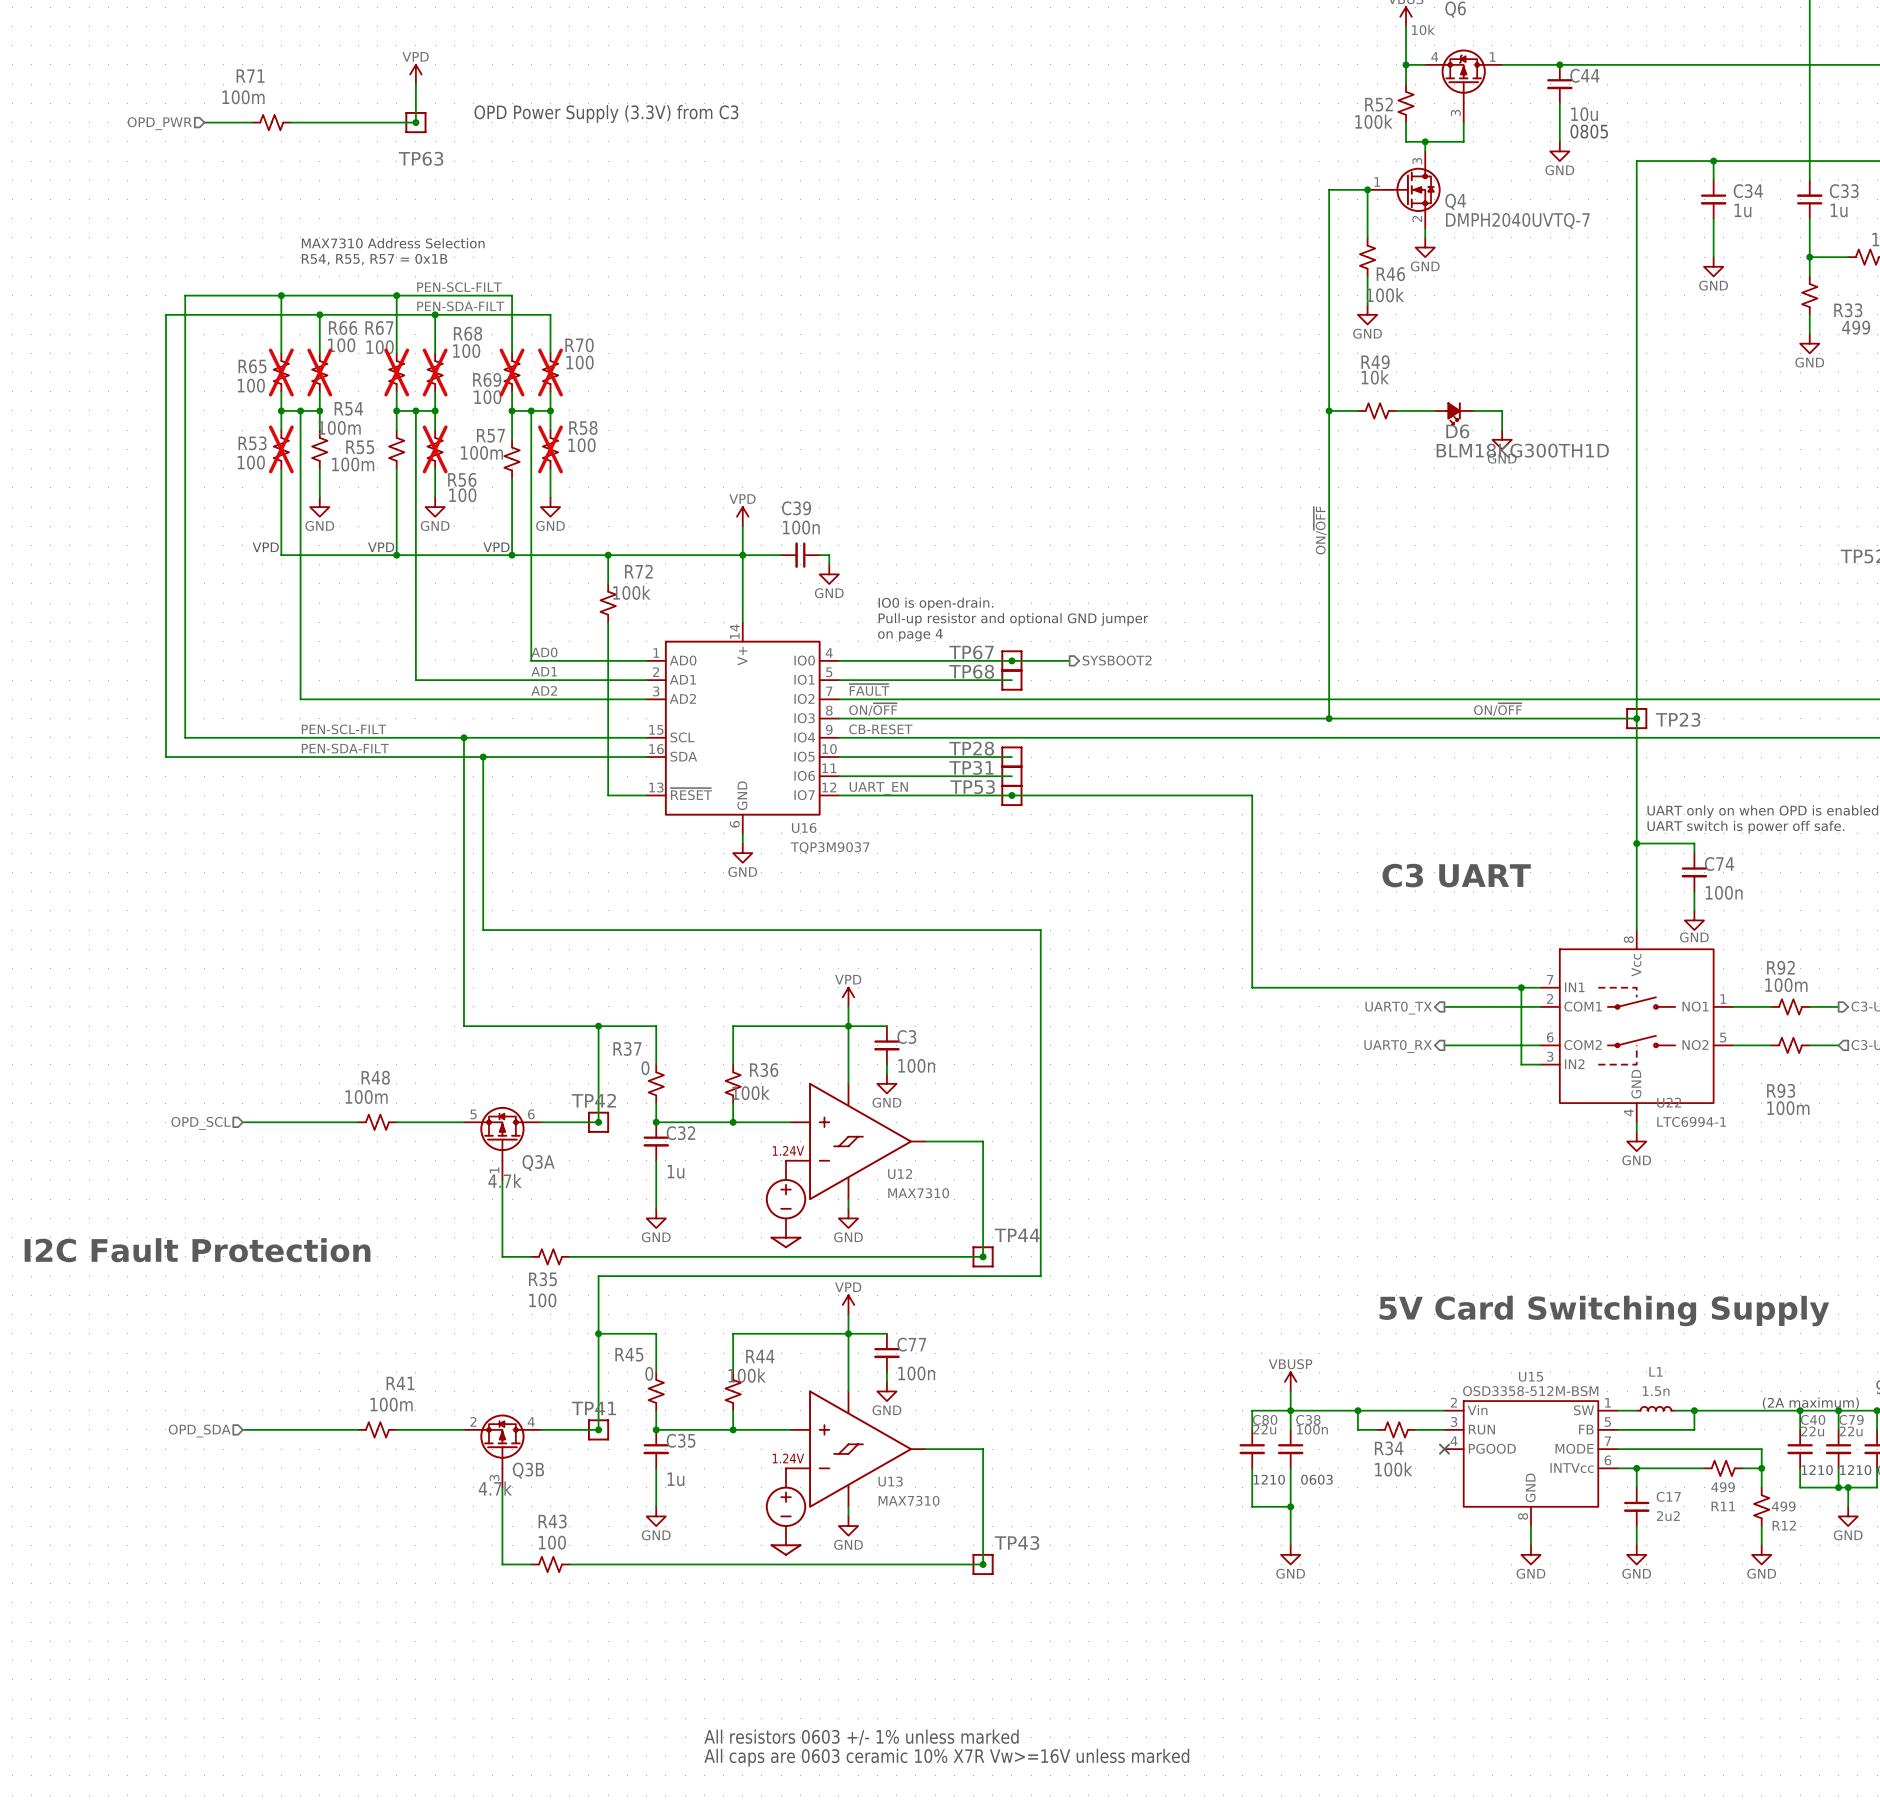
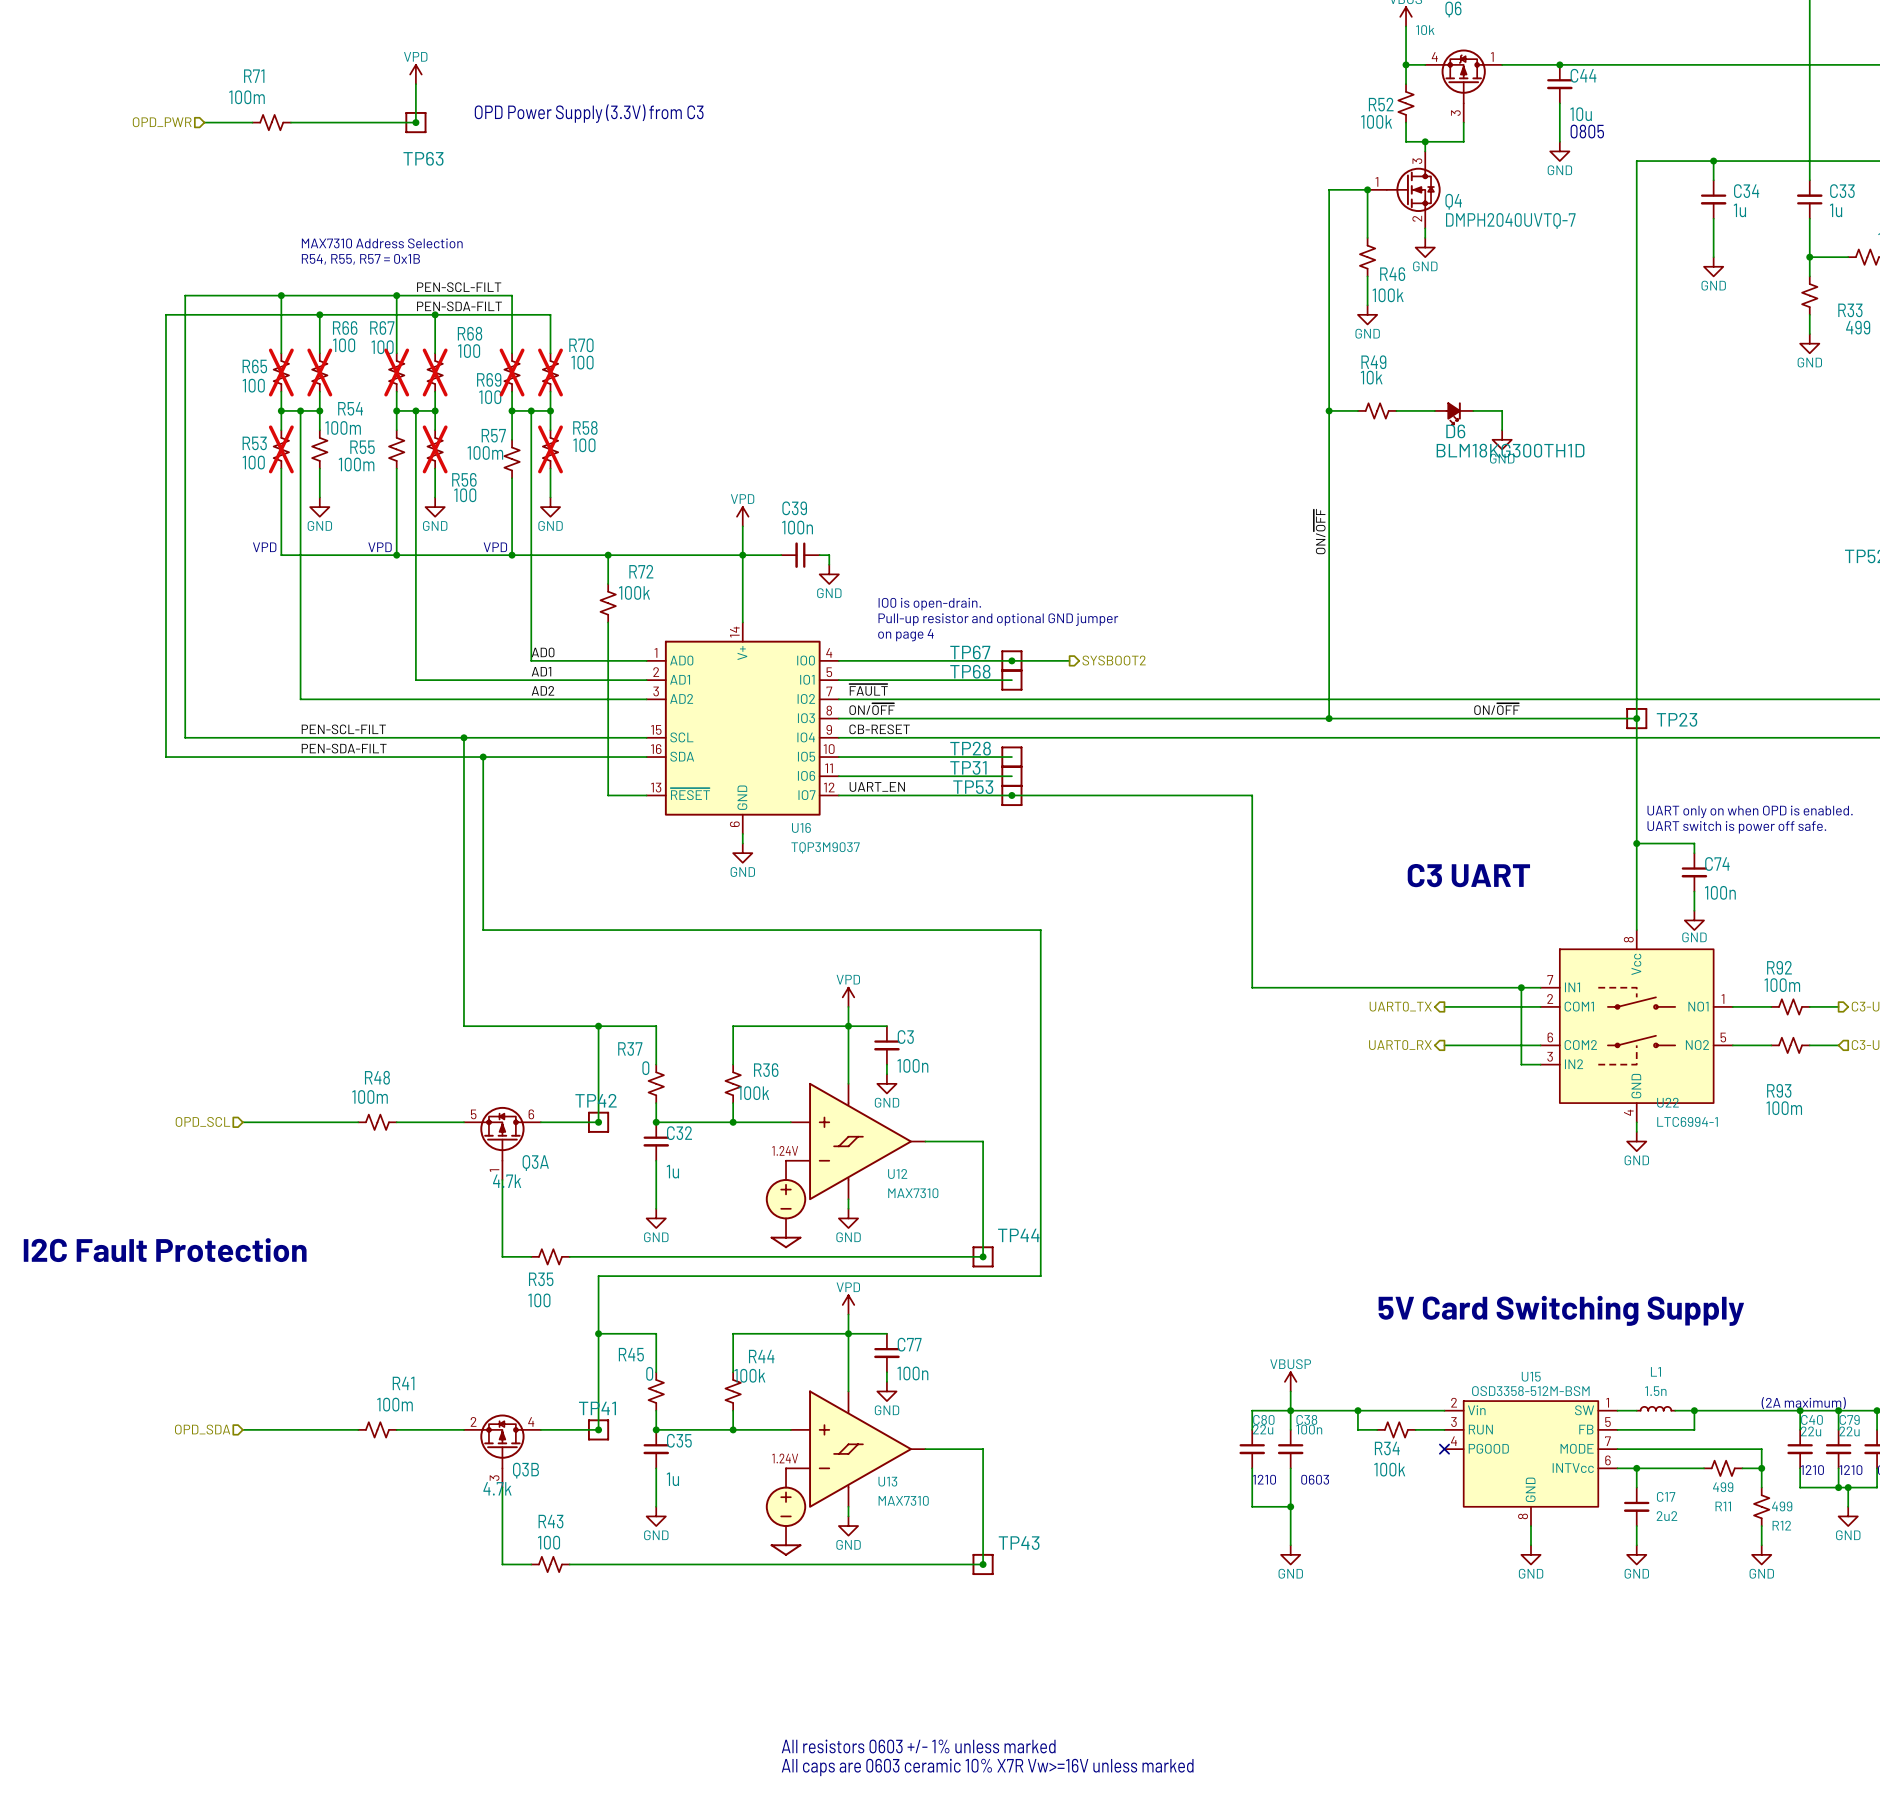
text position: All resistors 0603 +/- 1% unless marked (861, 1737) -> All resistors 0603 +/- 1% unless marked (918, 1746)
text position: All caps are 0603 ceramic 10% X7R Vw>=16V unless marked (946, 1757) -> All caps are 0603 ceramic 10% X7R Vw>=16V unless marked (987, 1767)

